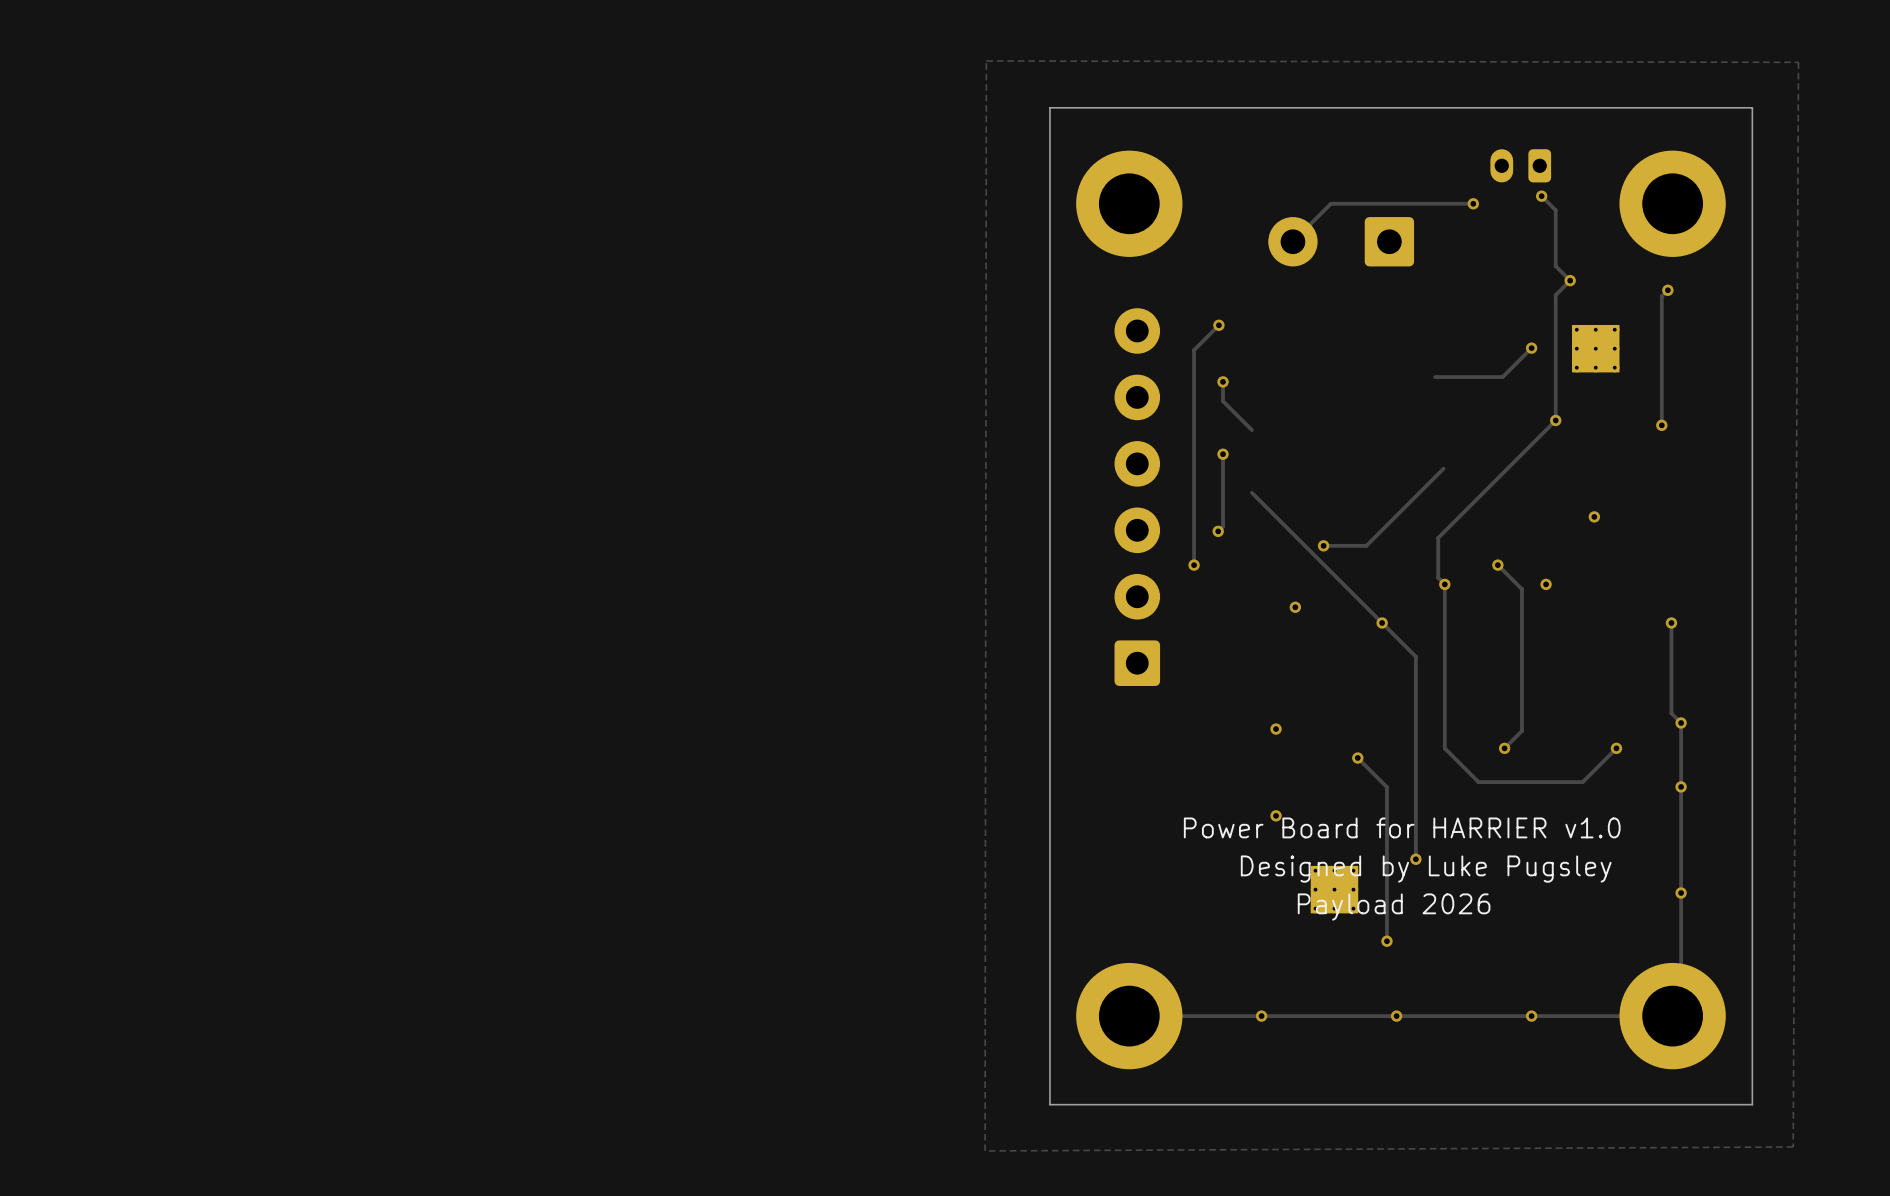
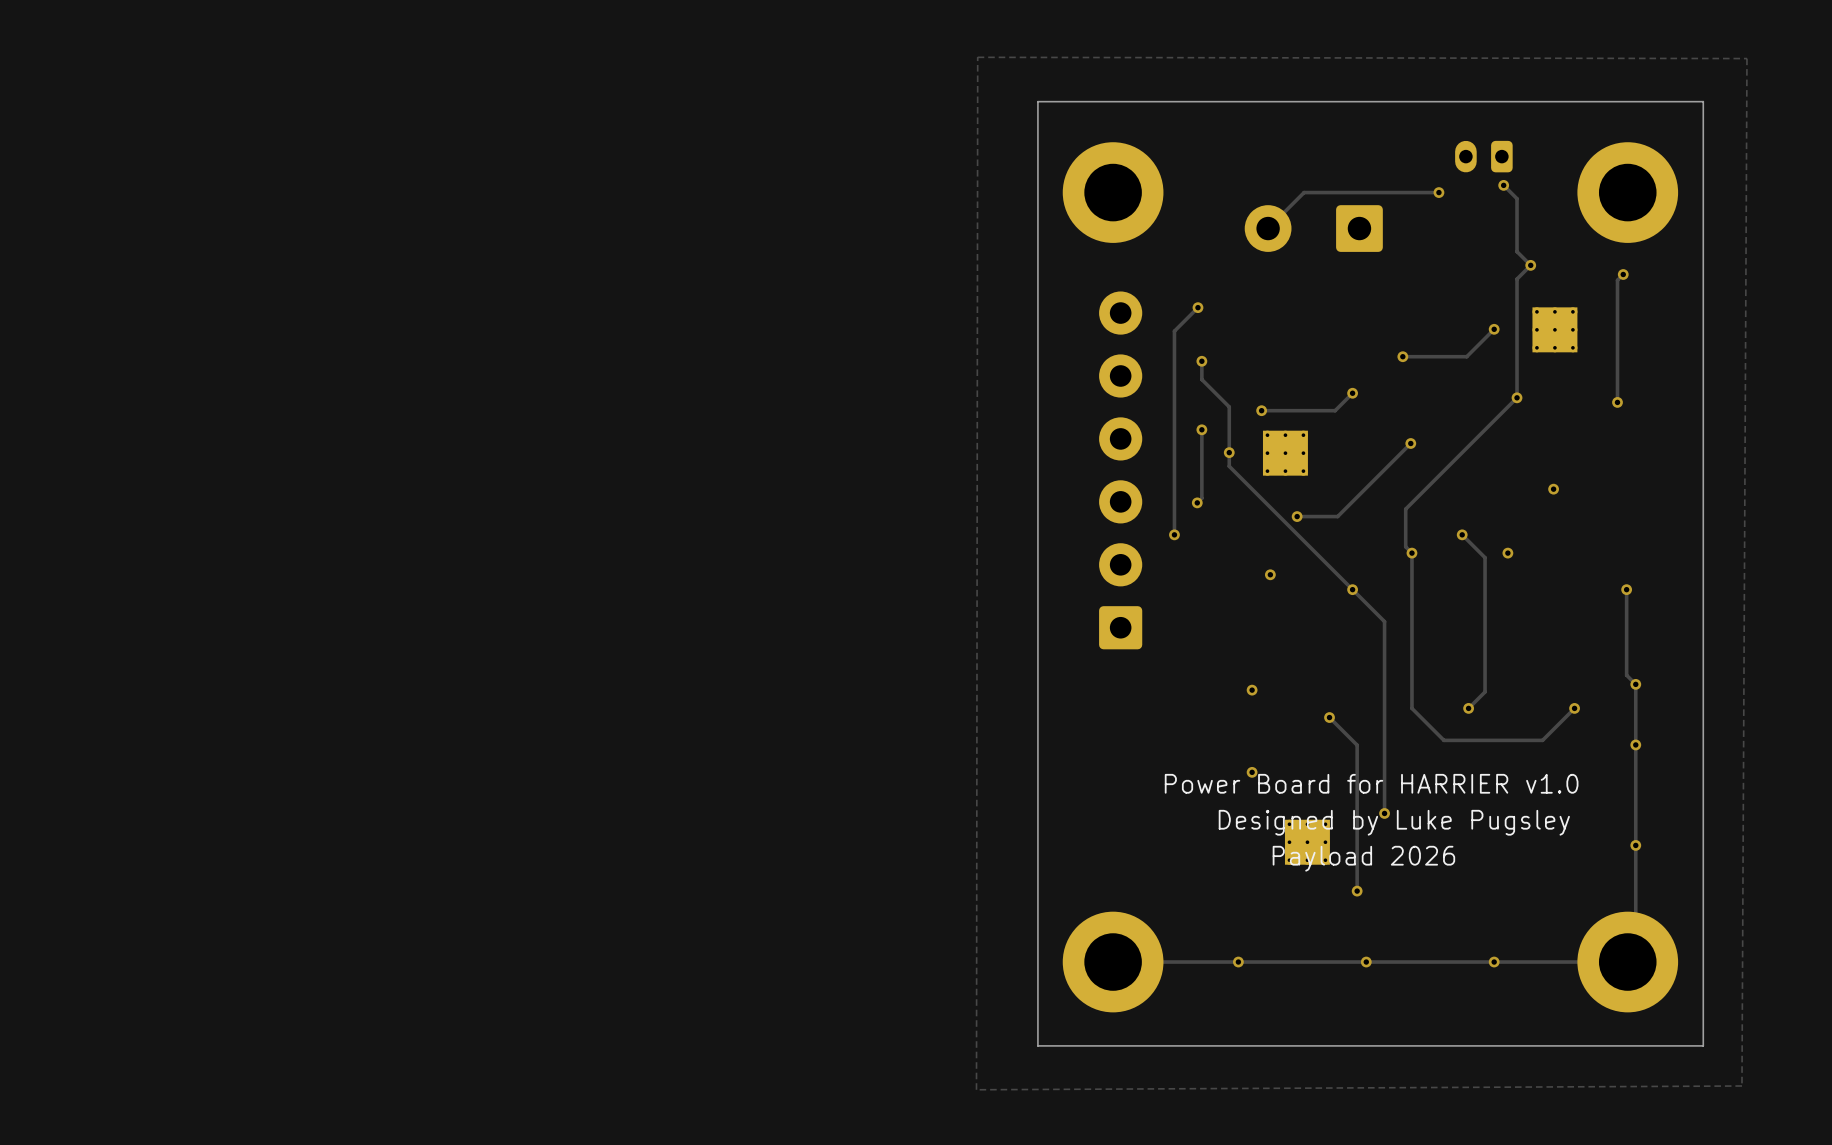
via: none -> (1402, 356)
track: none -> (1352, 393) (1335, 410) (1261, 410)
via: none -> (1352, 393)
track: none -> (1229, 406) (1229, 466)
via: none -> (1261, 410)
via: none -> (1410, 443)
via: none -> (1229, 452)
part: none -> (1285, 453)

